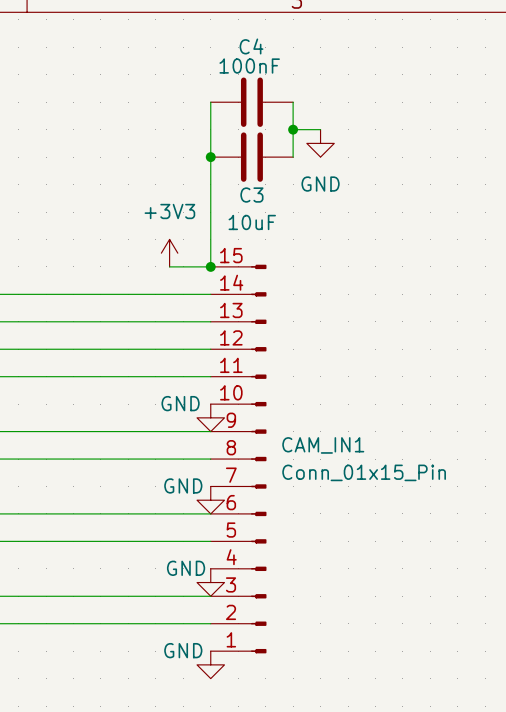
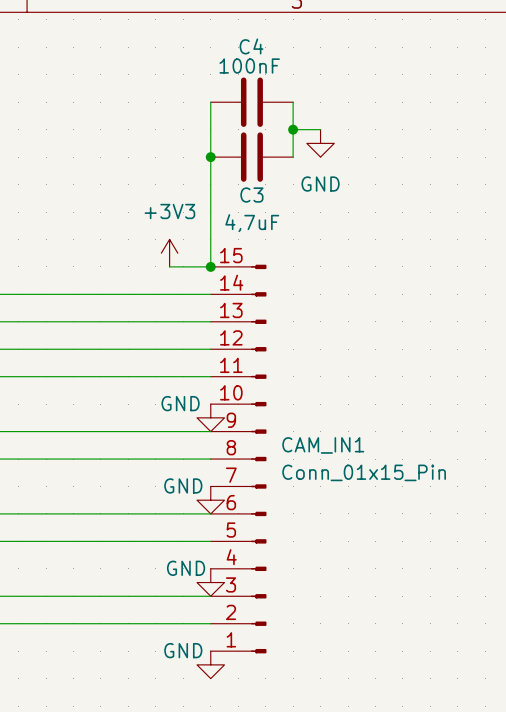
C3 value: 10uF (252, 222) -> 4,7uF (252, 223)

